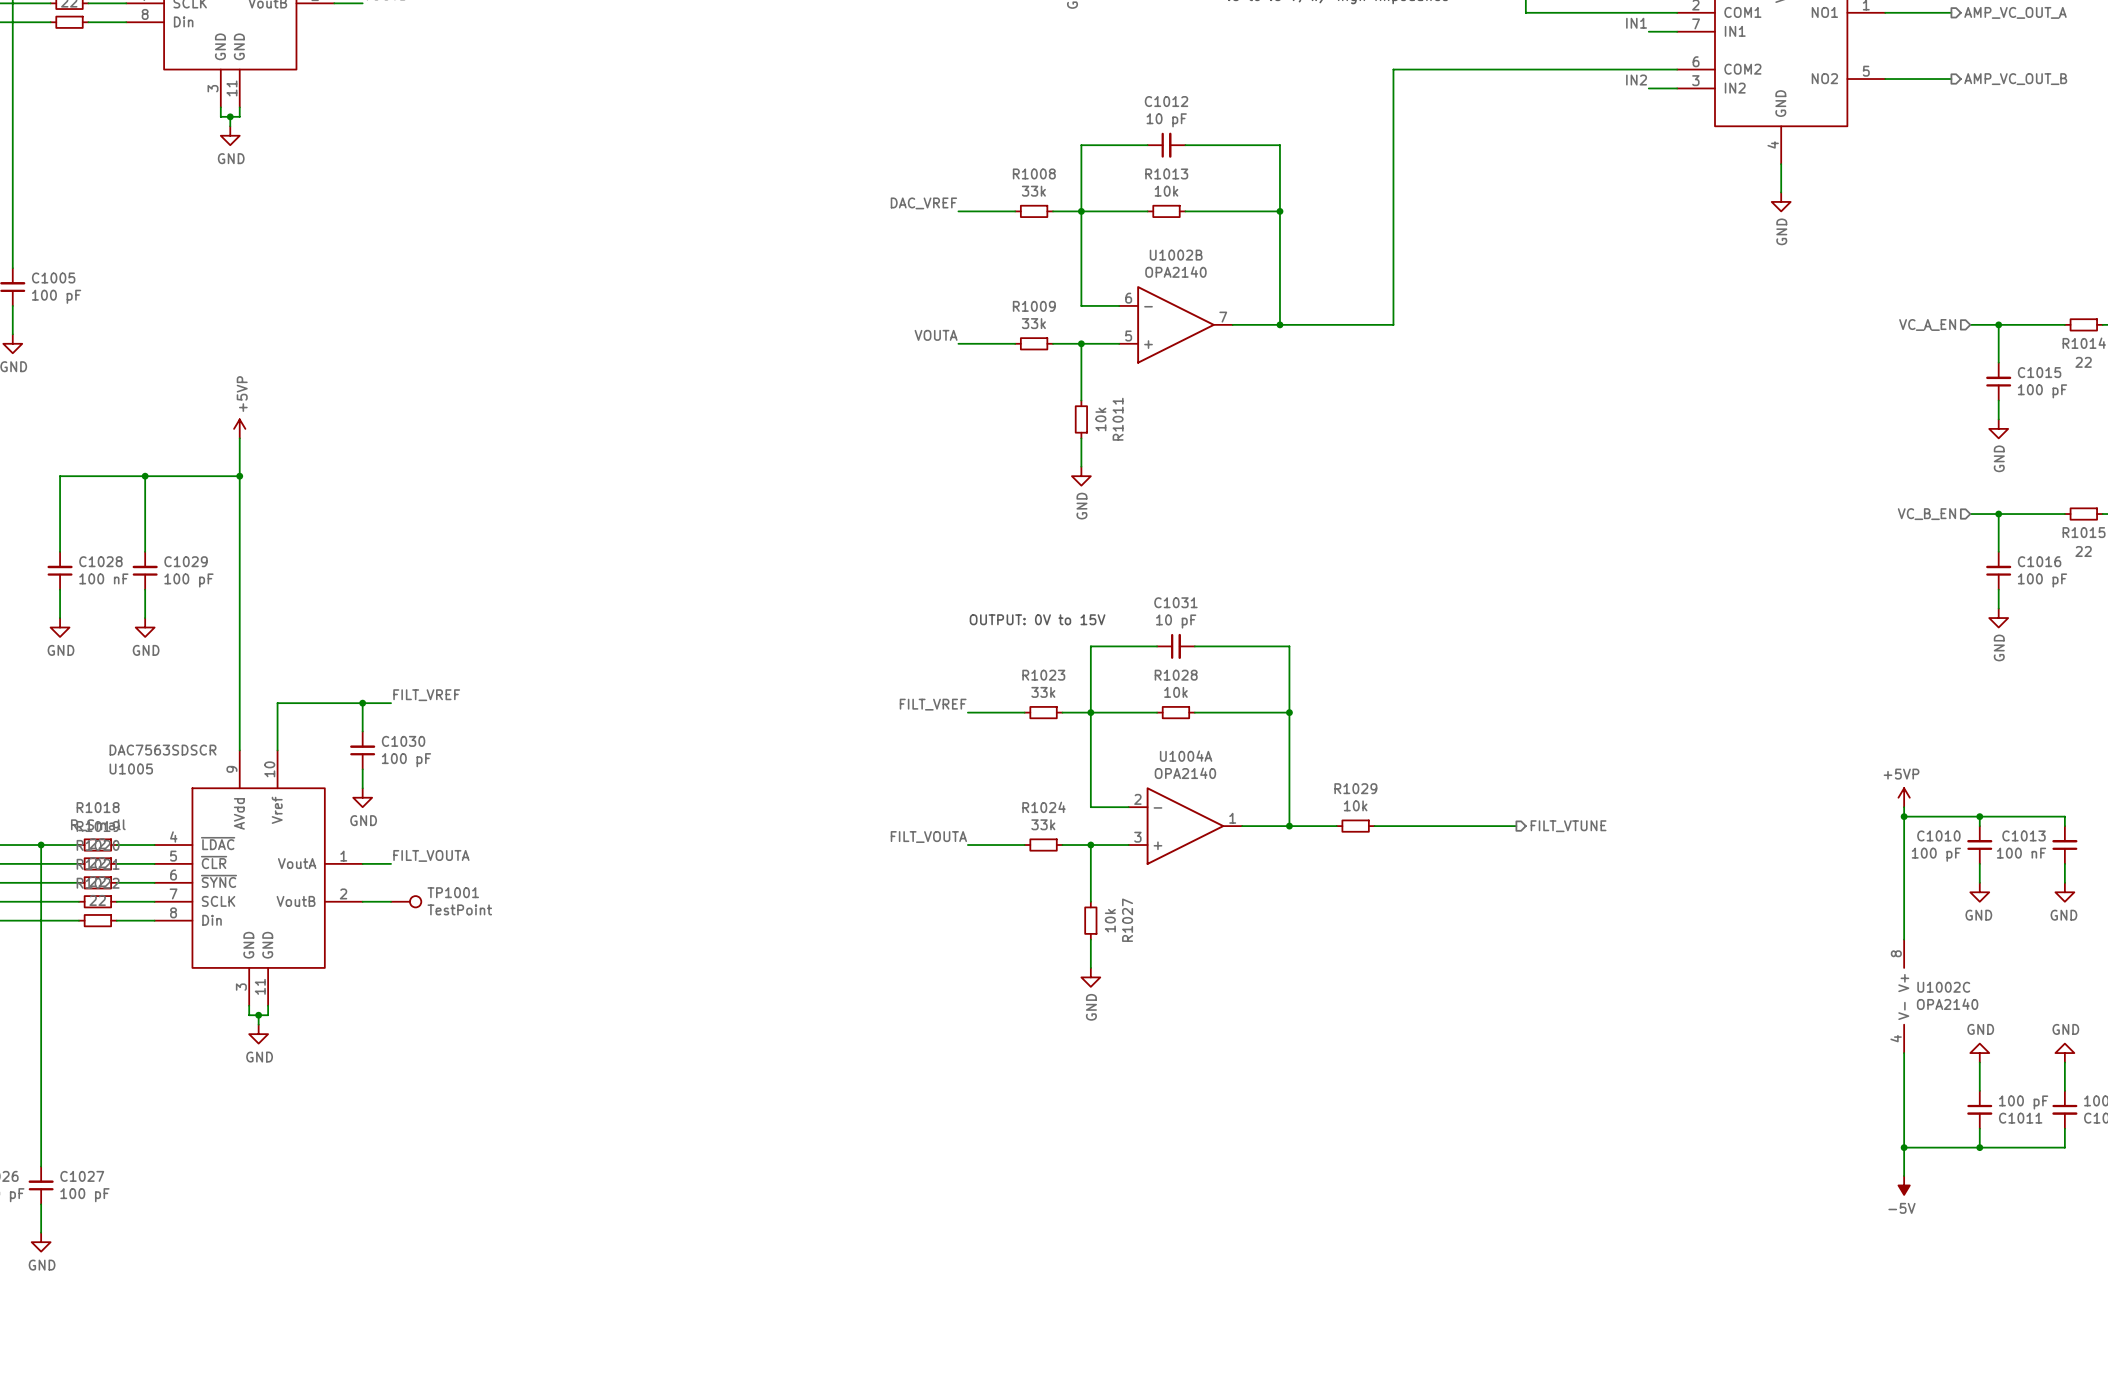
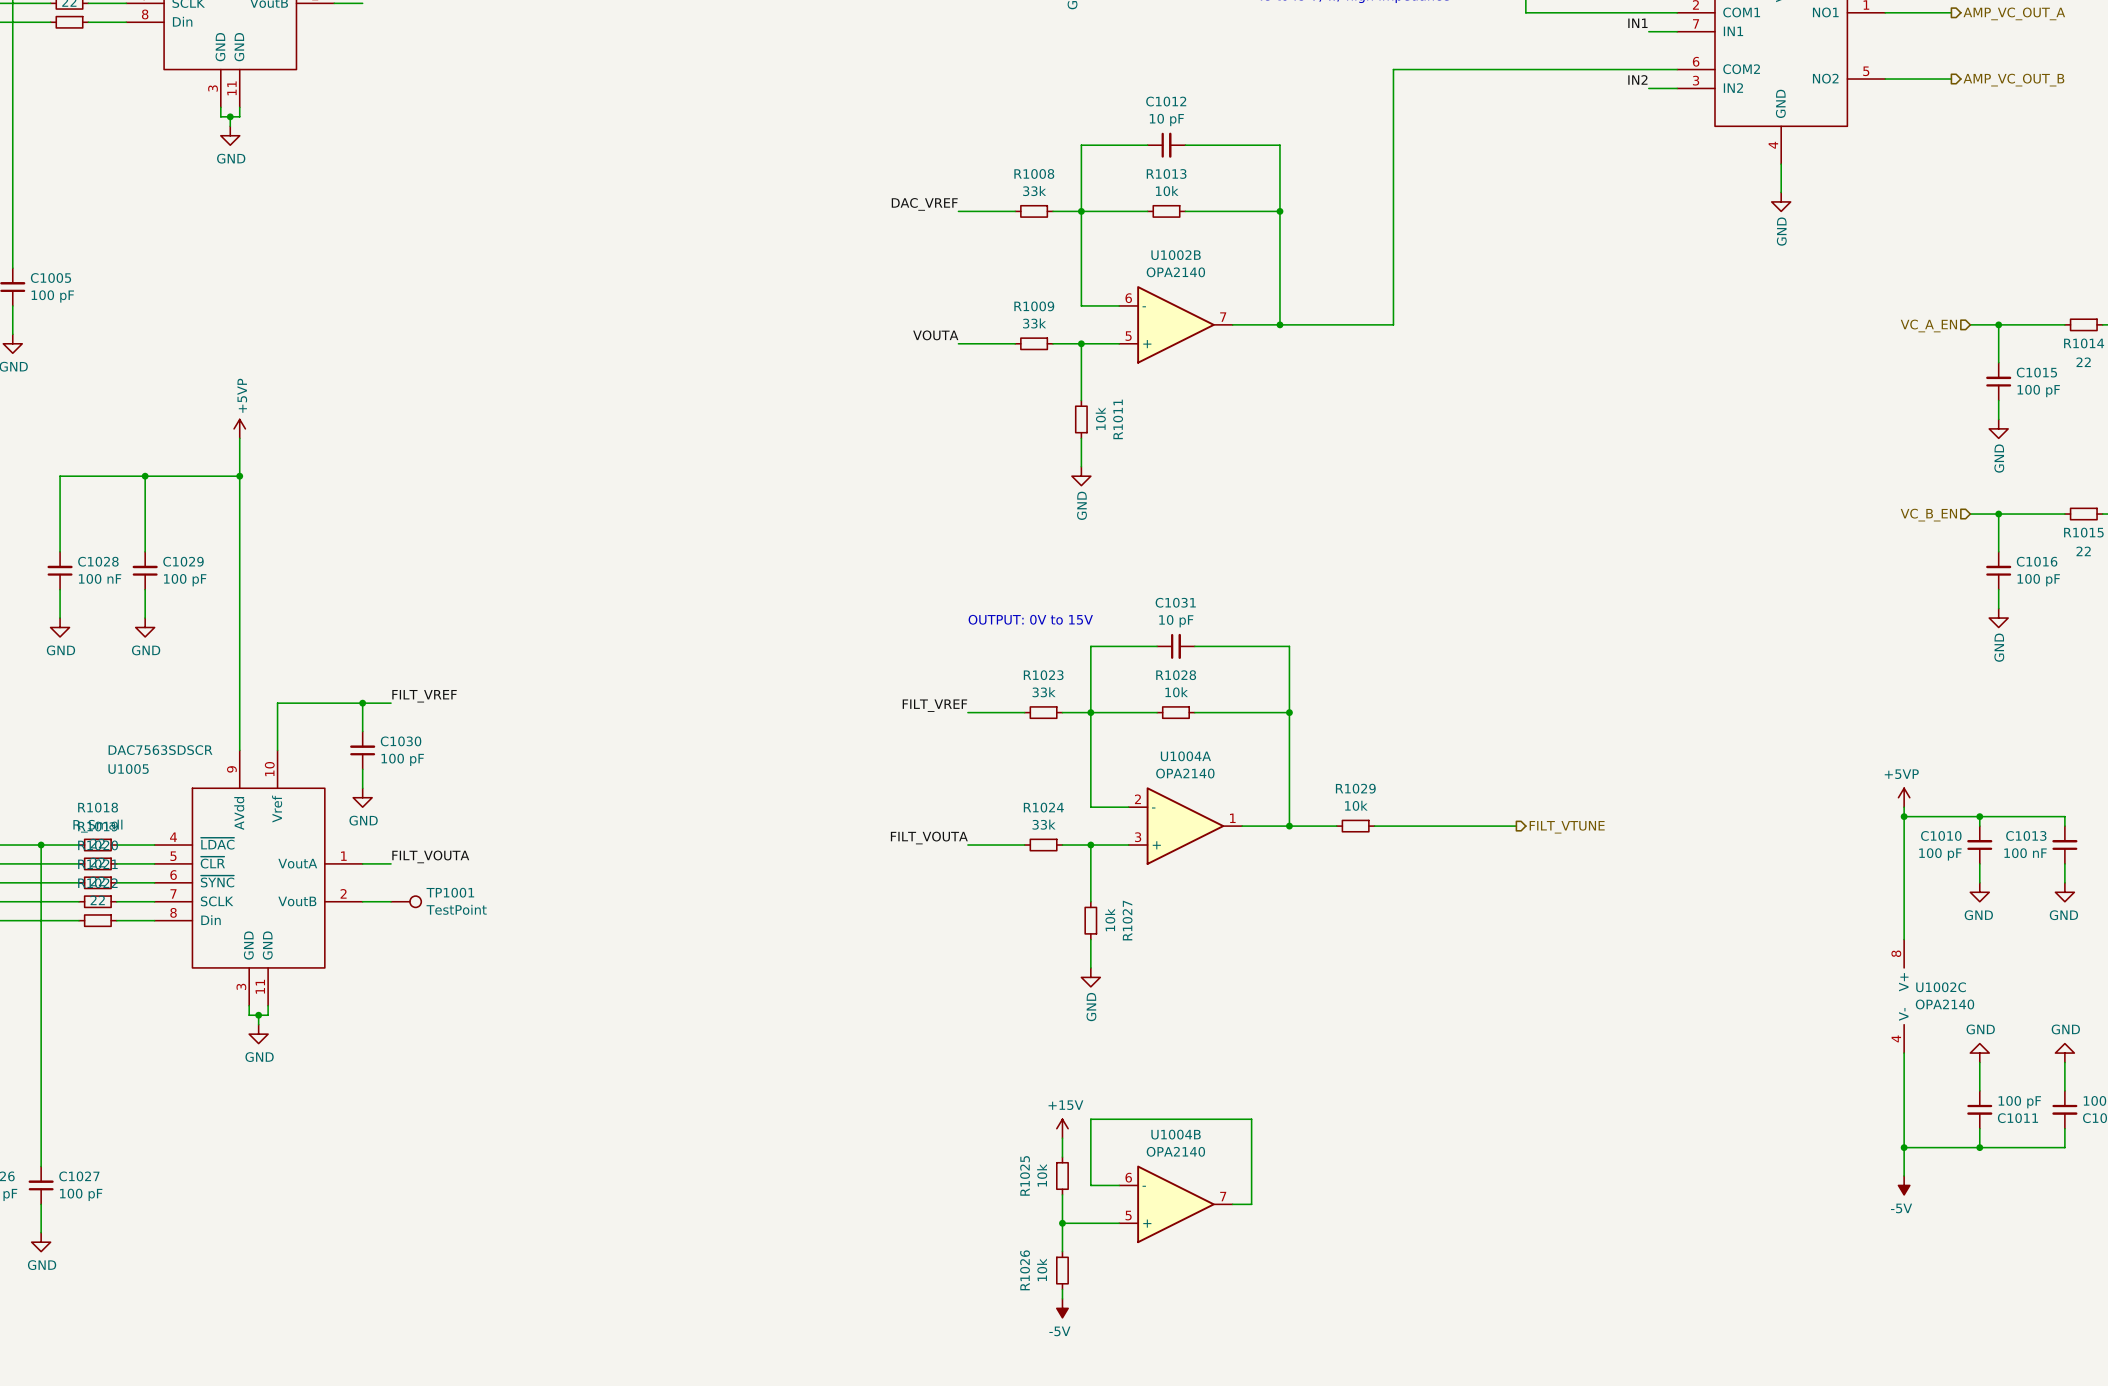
power symbol: none -> +15V (1062, 1128)
wire: none -> (1062, 1138) (1062, 1157)
R1025: none -> 10k (1062, 1175)
wire: none -> (1119, 1185) (1090, 1185) (1090, 1119) (1251, 1119) (1251, 1204) (1232, 1204)
wire: none -> (1062, 1194) (1062, 1251)
U1004B: none -> OPA2140 (1175, 1204)
wire: none -> (1062, 1223) (1119, 1223)
junction: none -> (1062, 1223)
R1026: none -> 10k (1062, 1270)
wire: none -> (1062, 1289) (1062, 1298)
power symbol: none -> -5V (1062, 1308)

